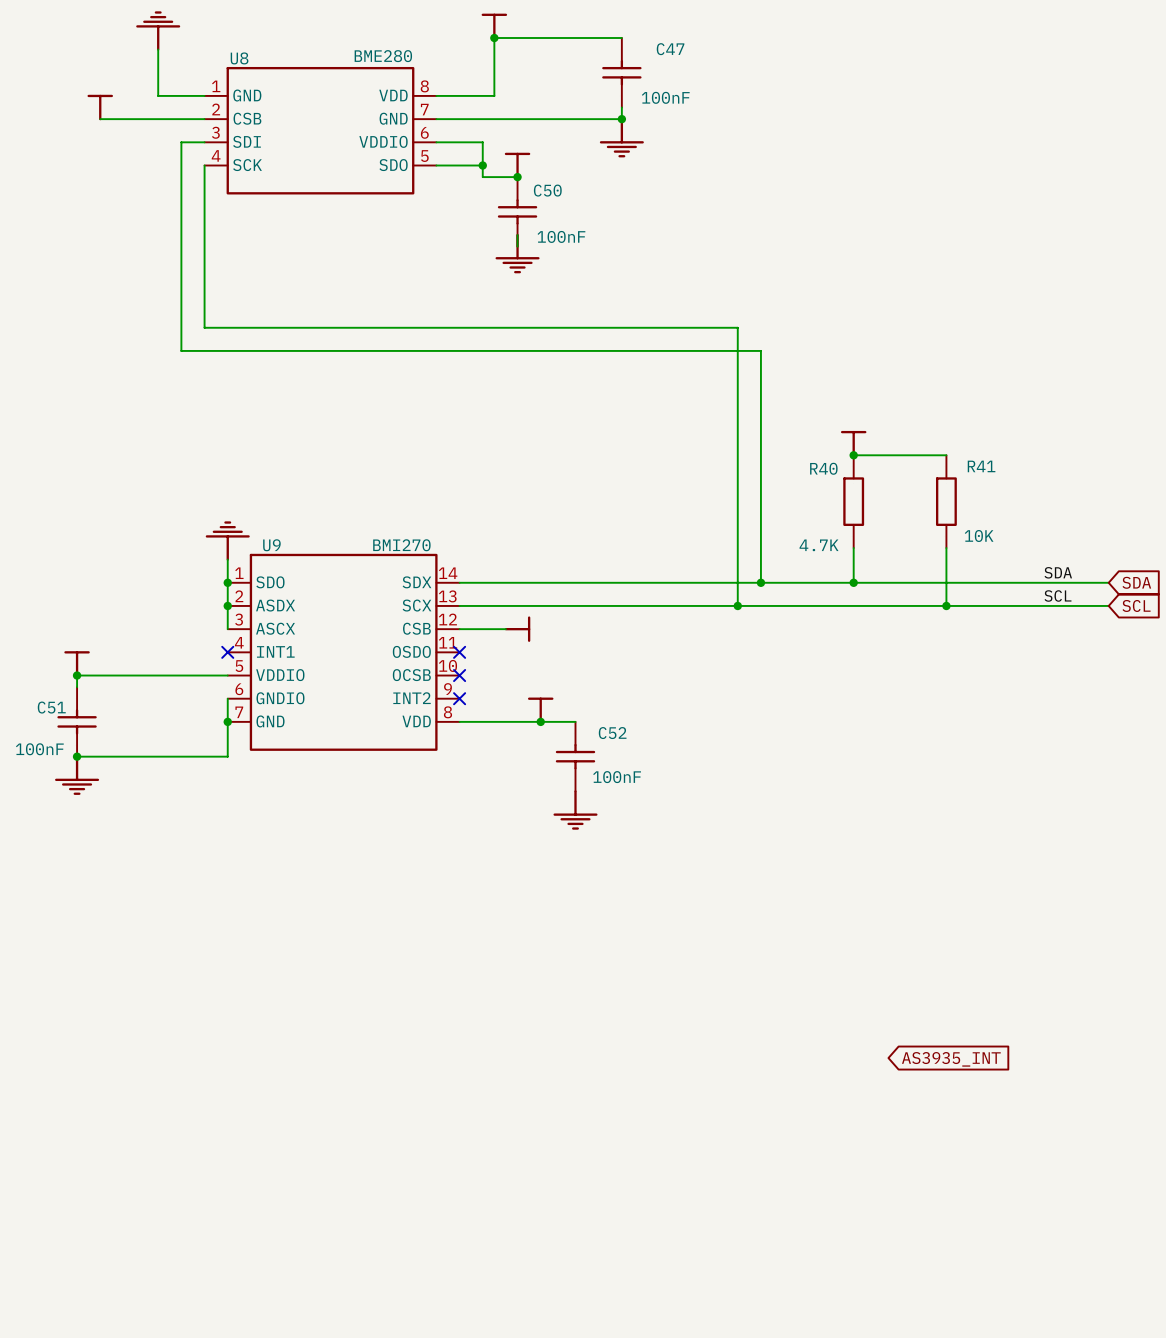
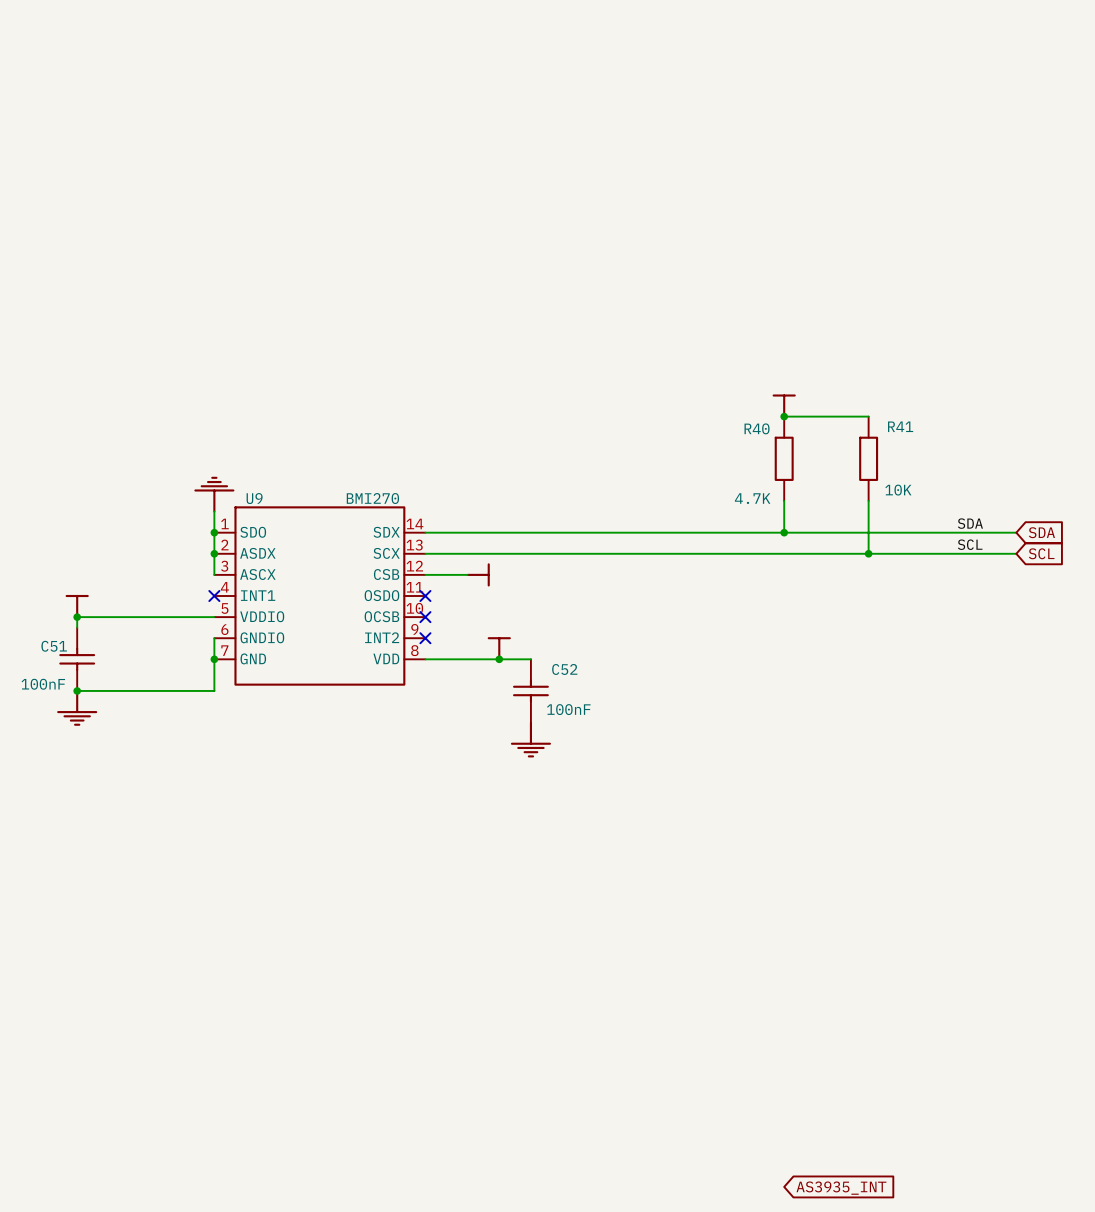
power symbol: (494, 26) -> none
power symbol: (158, 31) -> none
junction: (494, 37) -> none
wire: (621, 37) (494, 37) (494, 95) (436, 95) -> none
wire: (158, 49) (158, 95) (204, 95) -> none
C47: 100nF (621, 72) -> none
power symbol: (100, 107) -> none
wire: (621, 107) (621, 119) (436, 119) -> none
wire: (100, 119) (204, 119) -> none
junction: (621, 119) -> none
U8: BME280 (320, 130) -> none
power symbol: (621, 137) -> none
wire: (204, 142) (181, 142) (181, 350) (760, 350) (760, 582) -> none
wire: (436, 142) (482, 142) (482, 177) (517, 177) -> none
wire: (204, 165) (204, 327) (737, 327) (737, 605) -> none
wire: (436, 165) (482, 165) -> none
junction: (482, 165) -> none
power symbol: (517, 165) -> none
junction: (517, 177) -> none
C50: 100nF (517, 211) -> none
wire: (517, 235) (517, 246) -> none
power symbol: (517, 253) -> none
junction: (760, 582) -> none
junction: (737, 605) -> none
global label: AS3935_INT (951, 1059) -> none
global label: none -> AS3935_INT (841, 1188)

